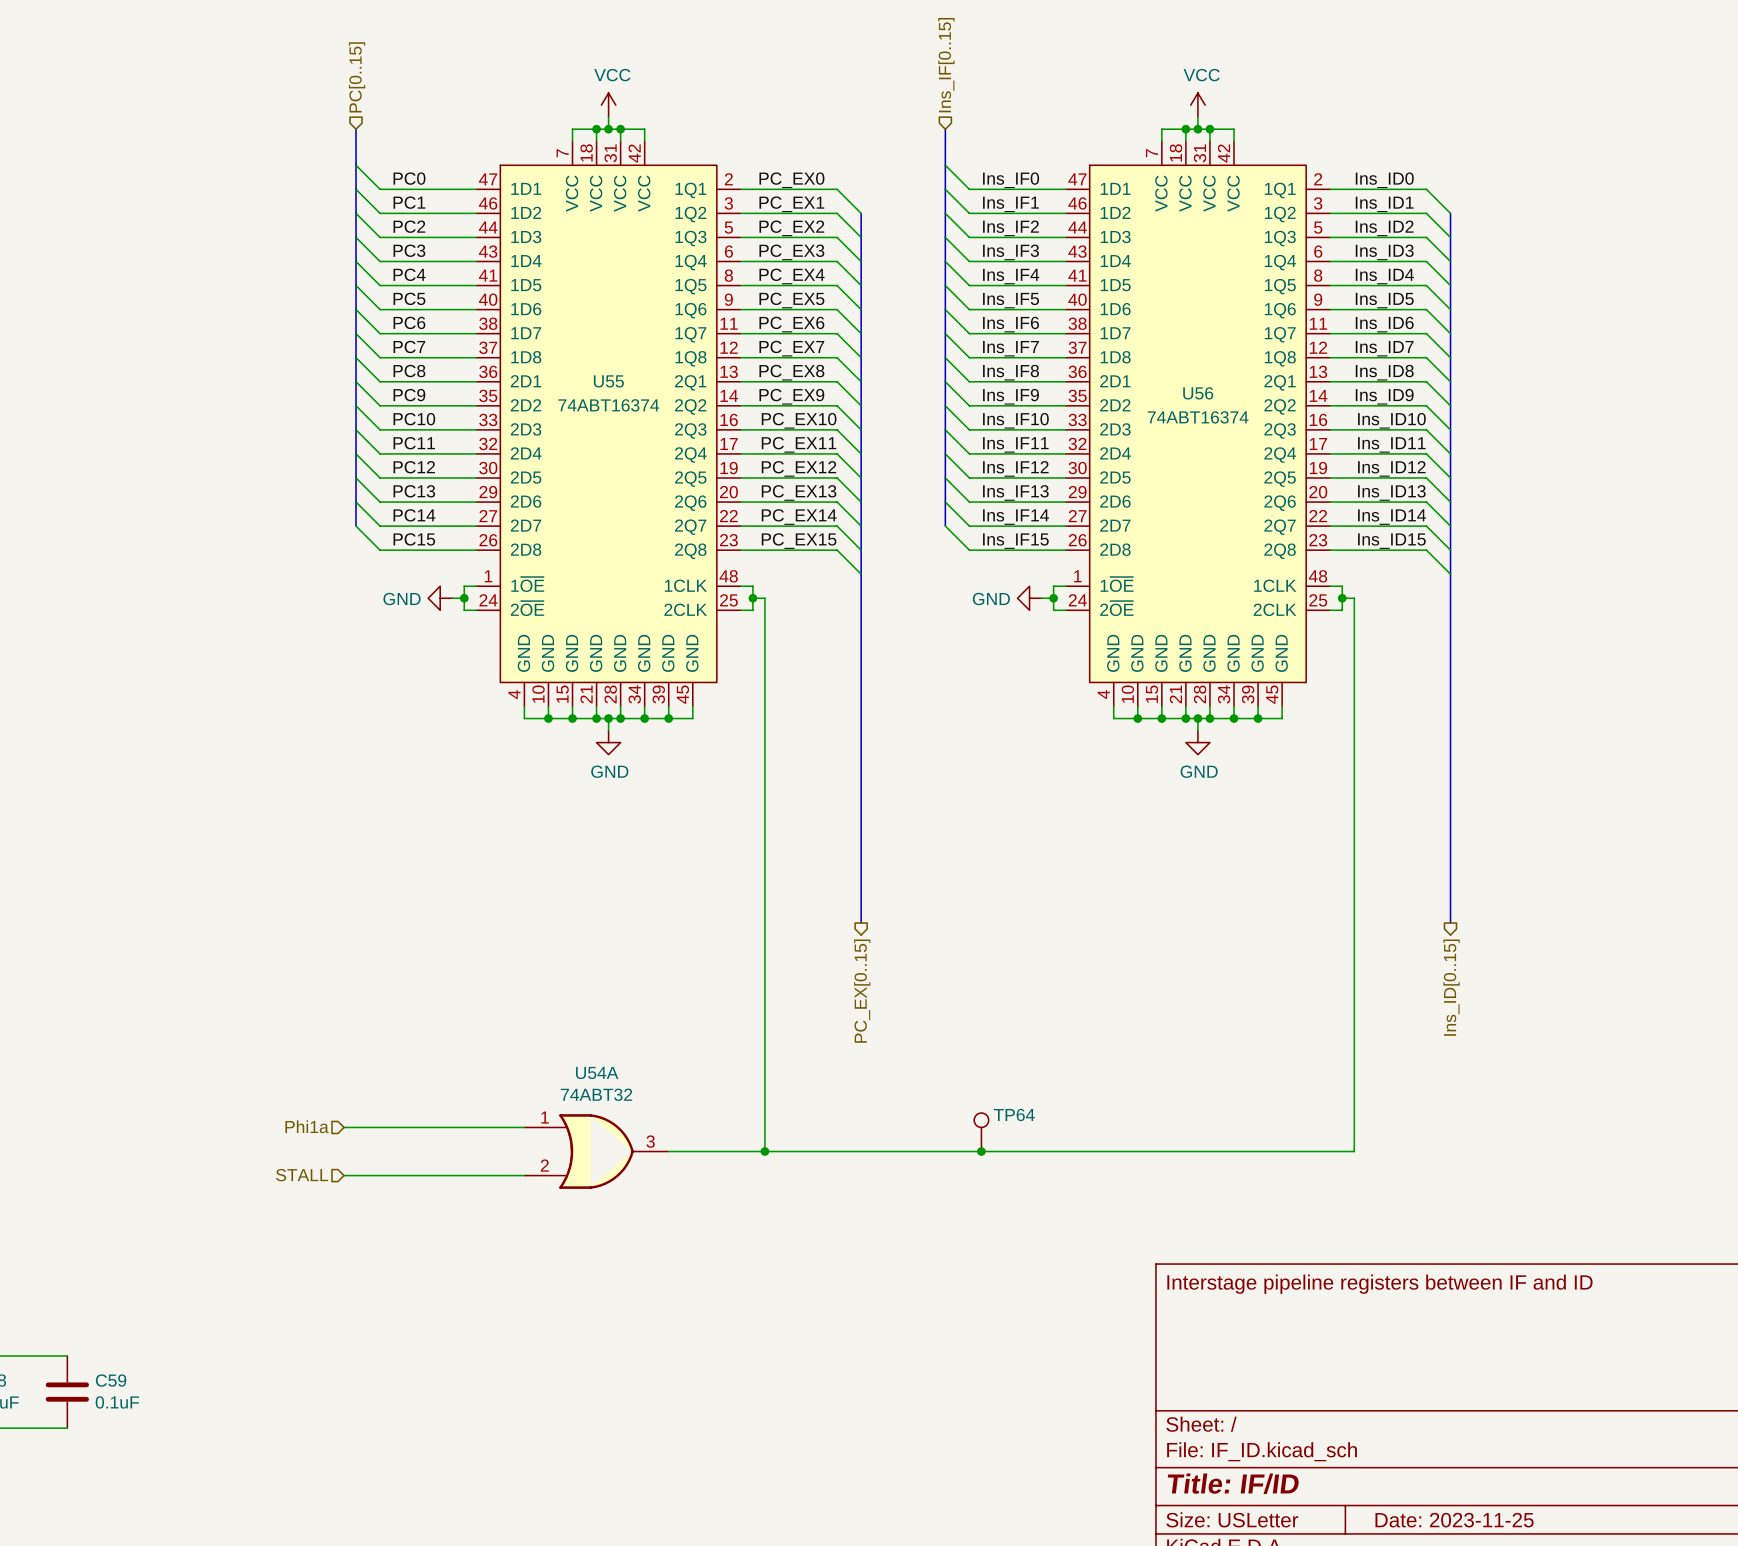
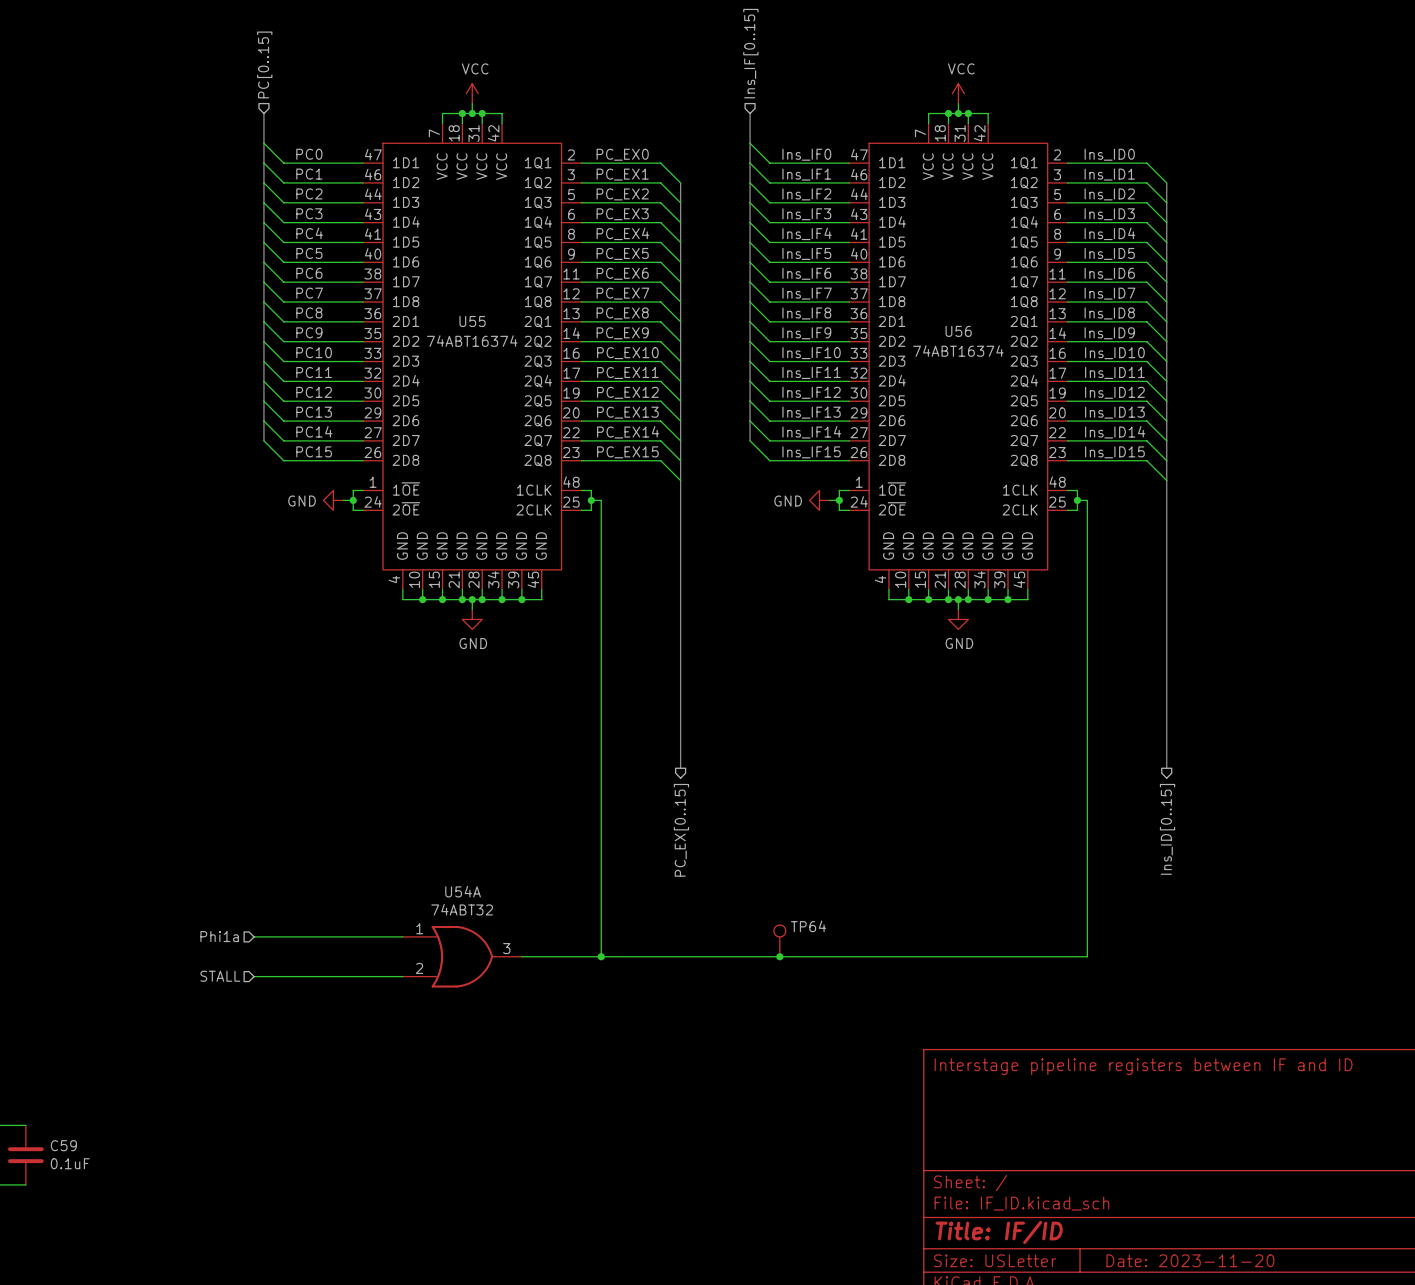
title block: Date: 2023-11-25 (1454, 1520) -> Date: 2023-11-20 (1190, 1260)

